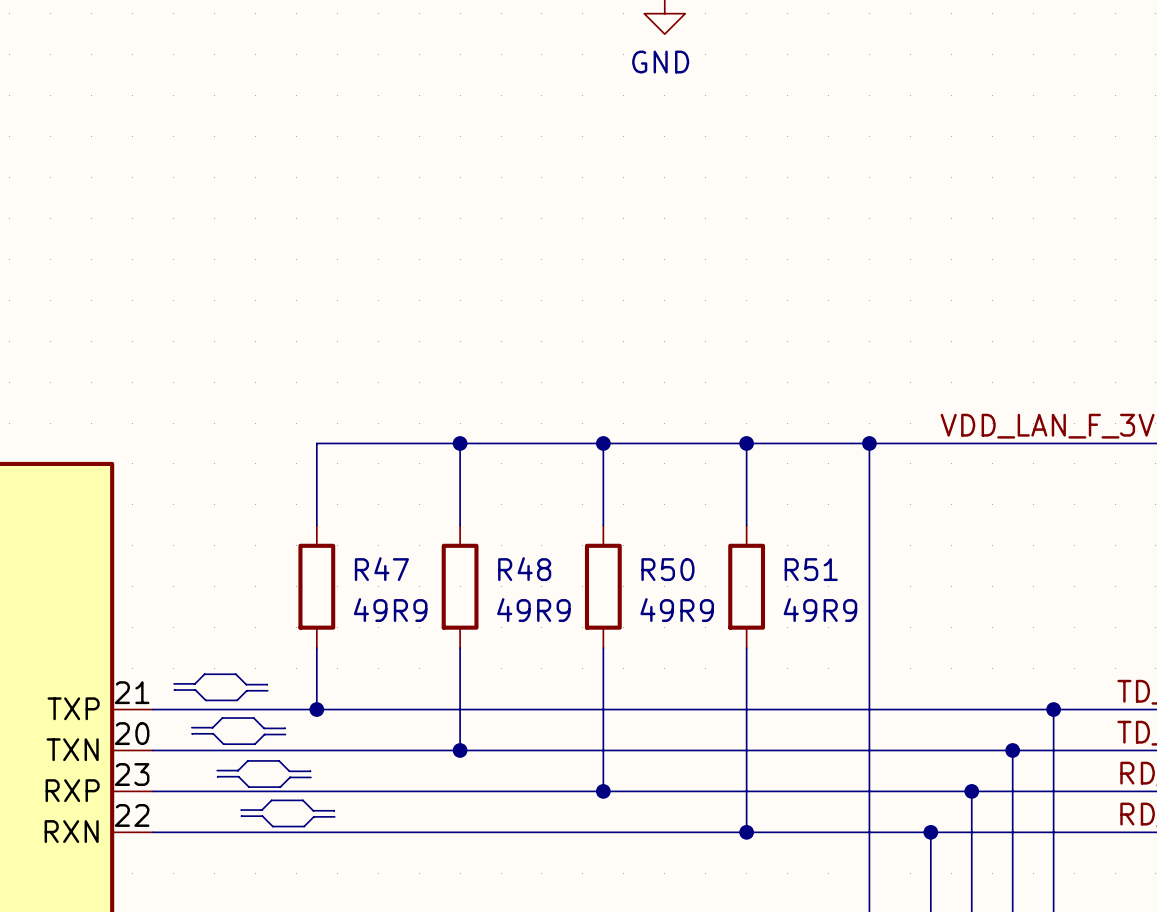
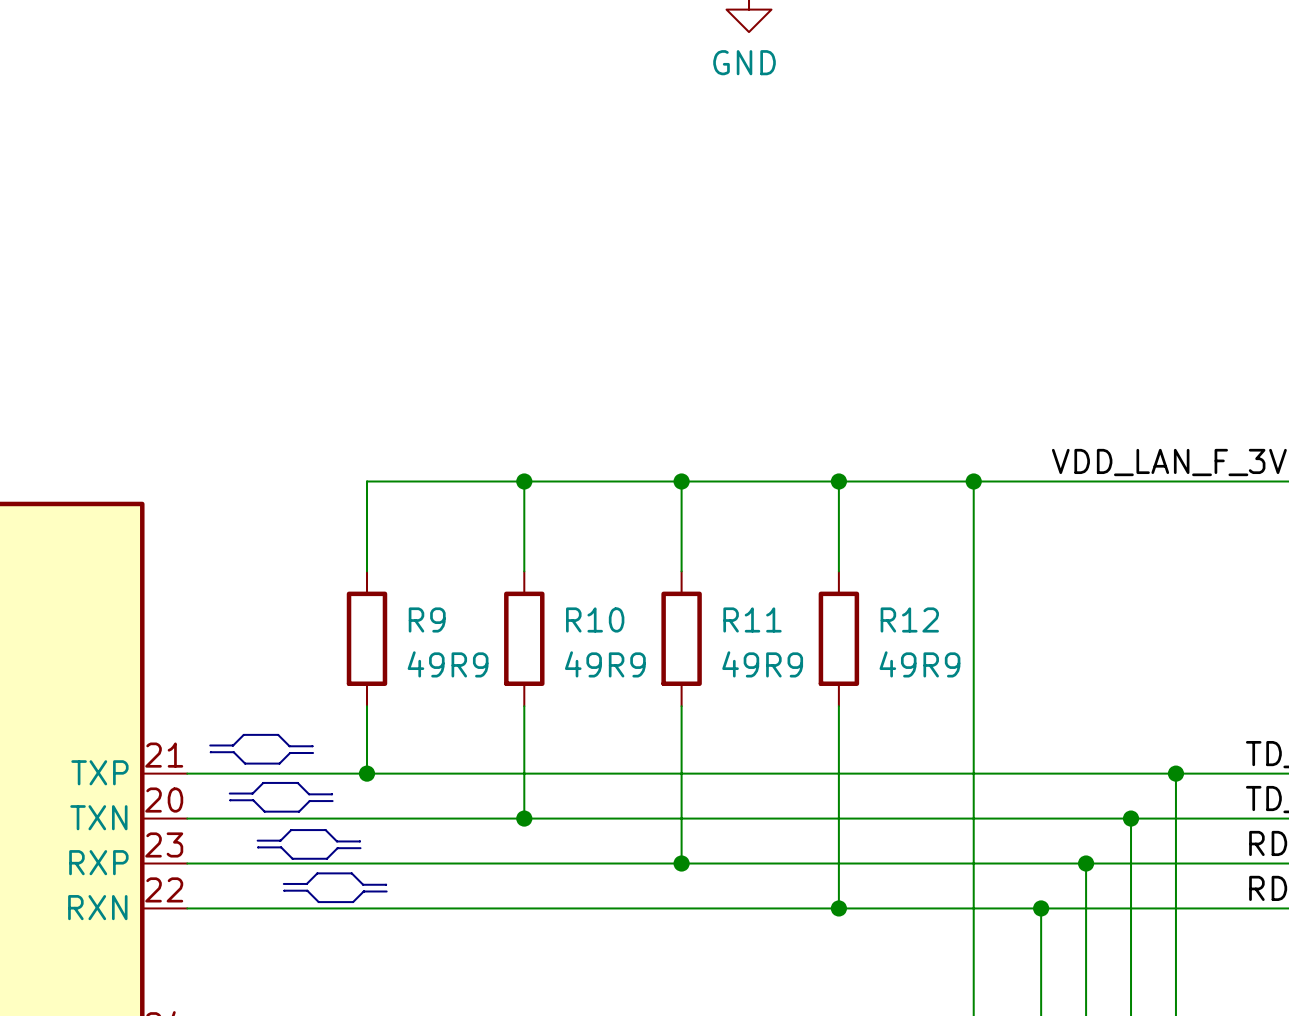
R47 name: R47 (381, 569) -> R9 (427, 619)
R48 name: R48 (524, 569) -> R10 (595, 619)
R50 name: R50 (667, 569) -> R11 (752, 619)
R51 name: R51 (811, 569) -> R12 (909, 619)

